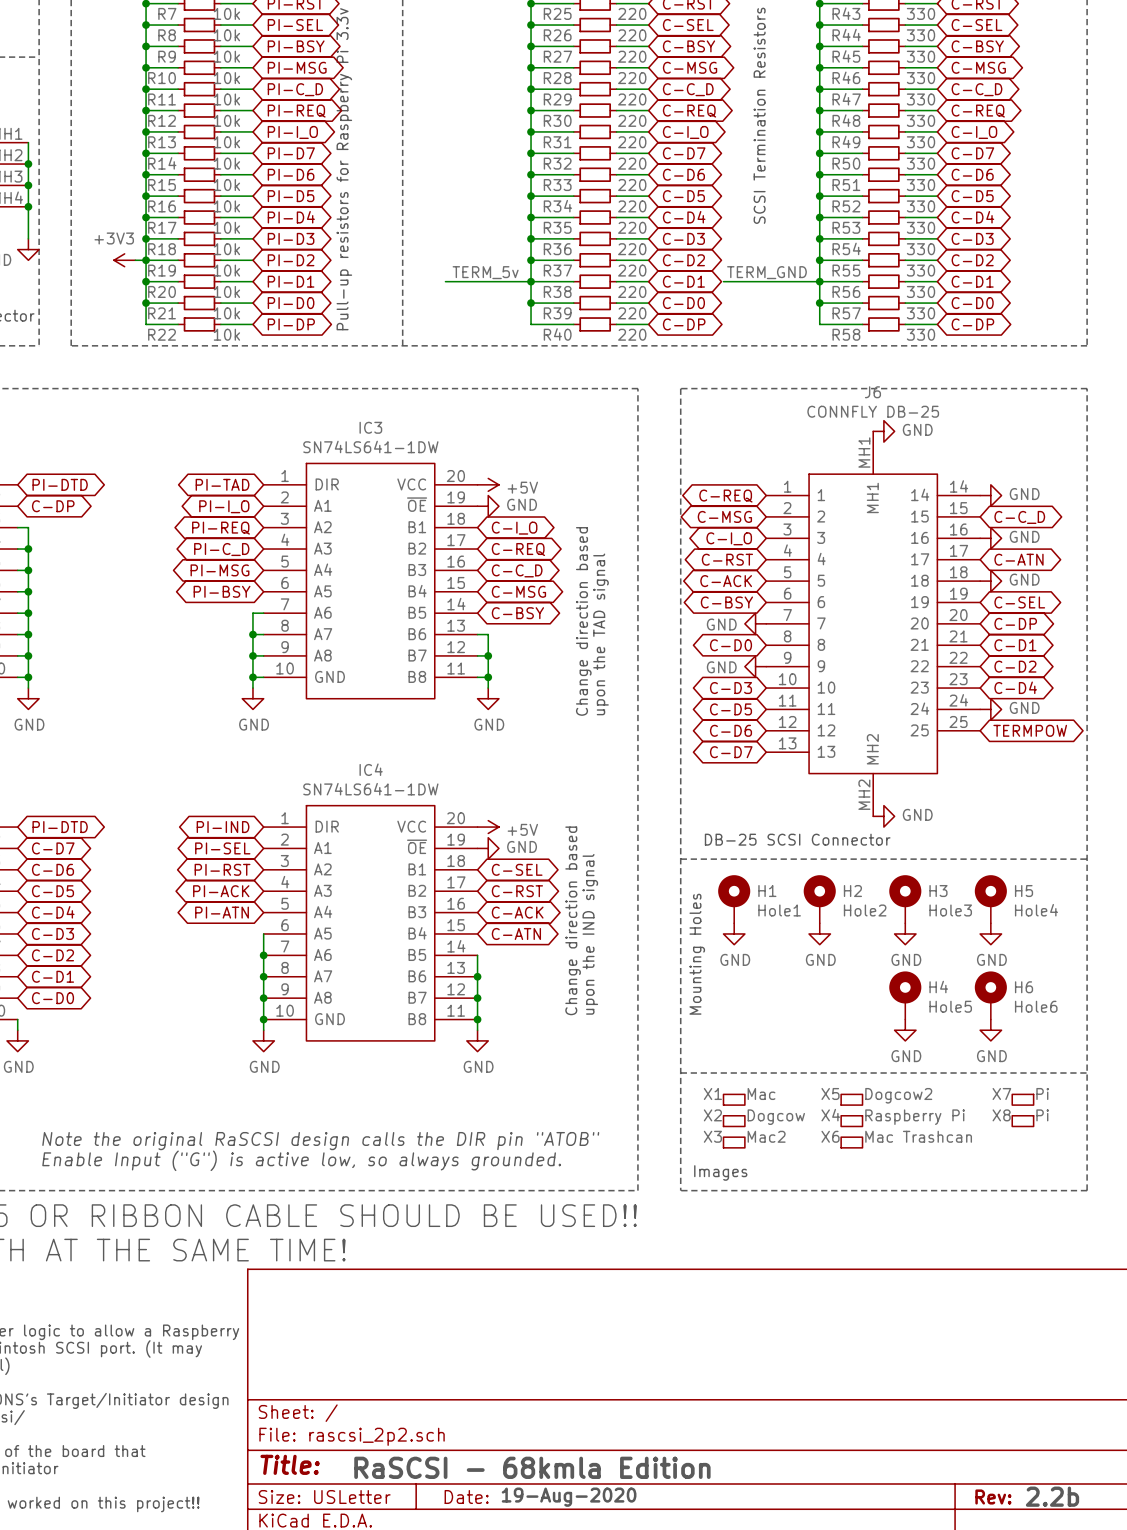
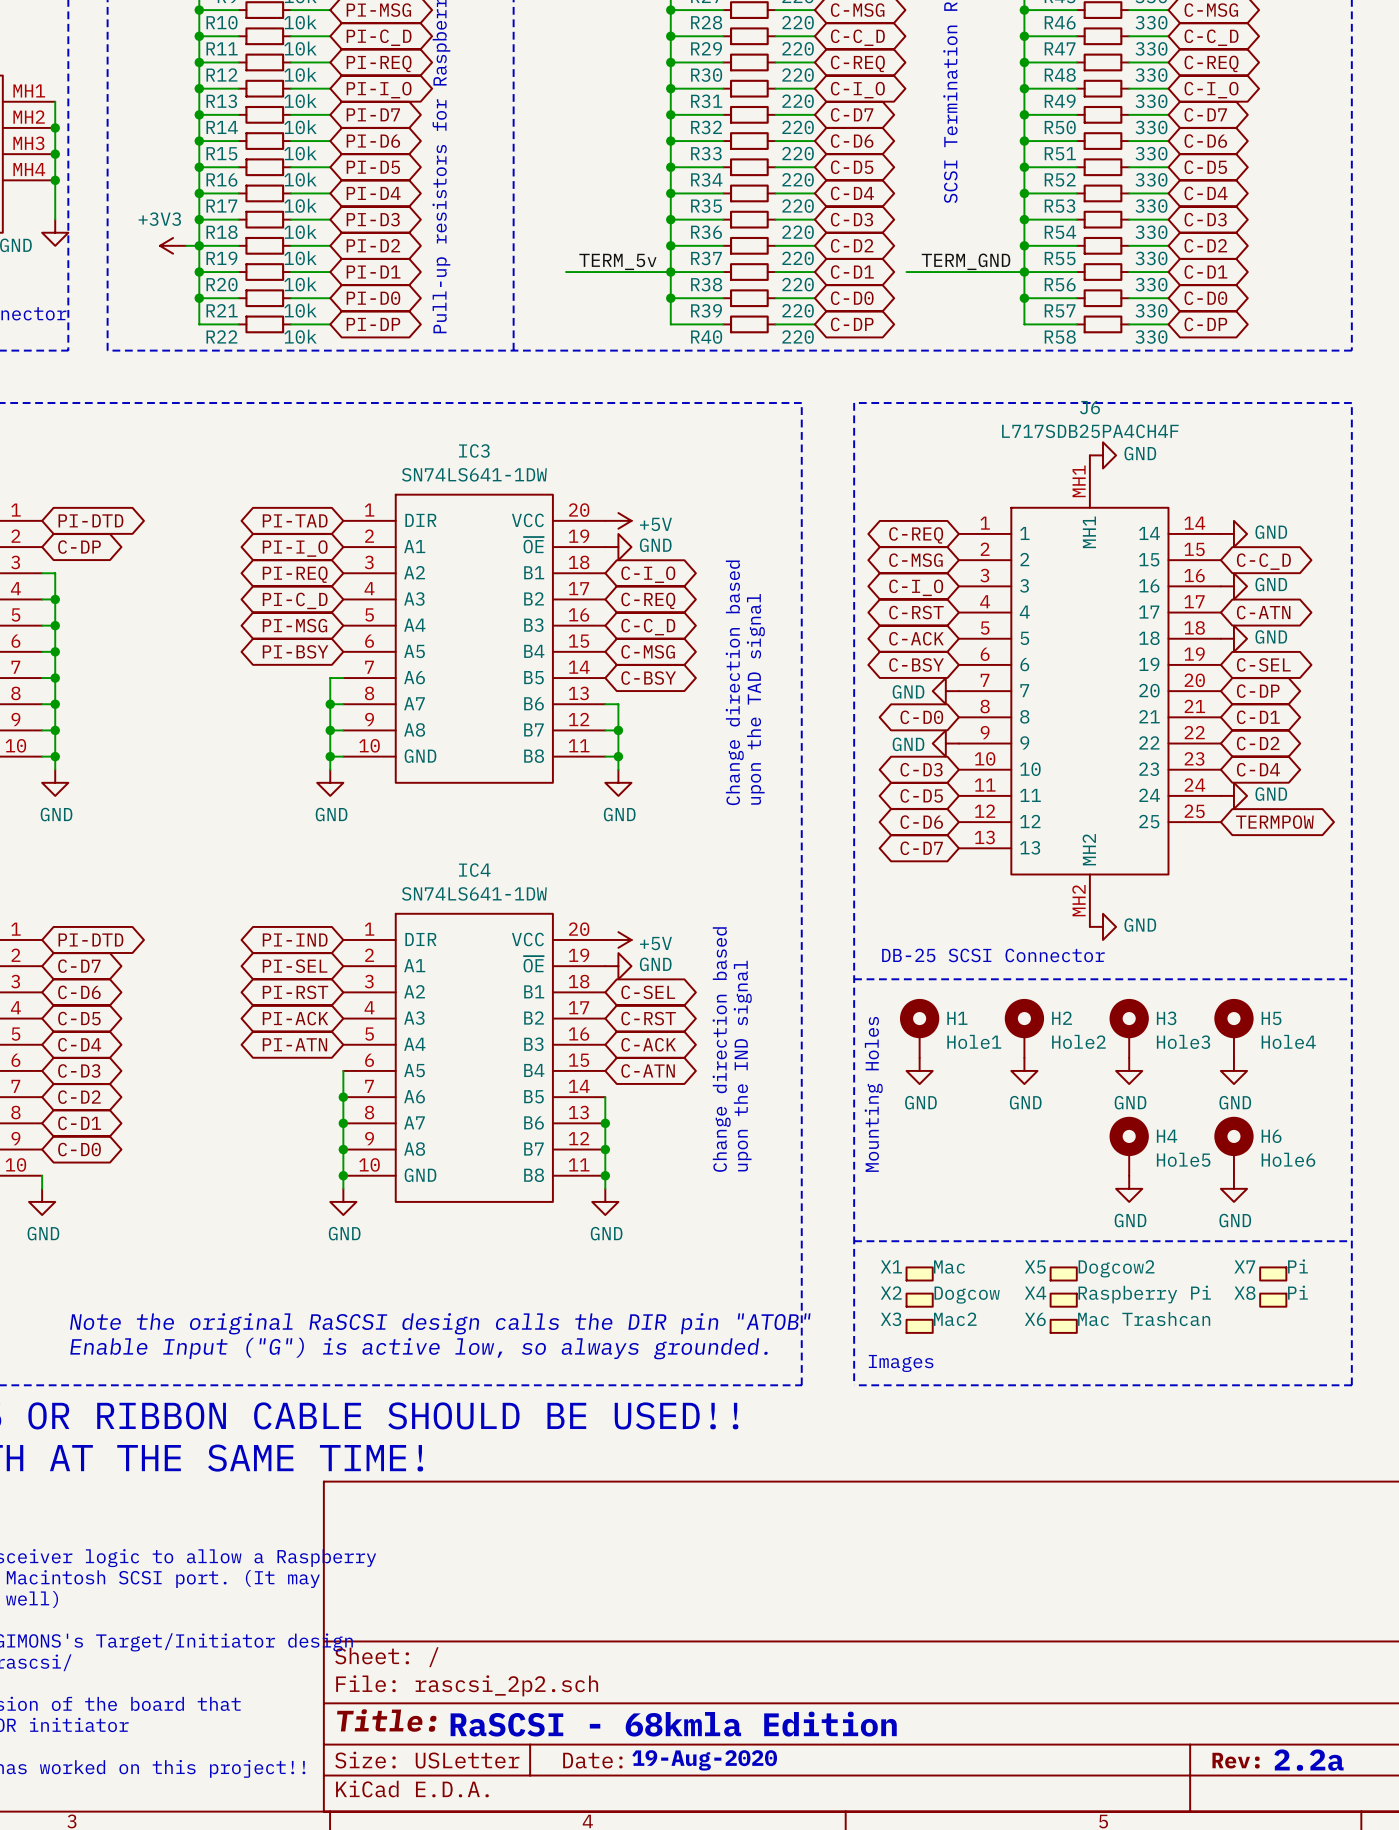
J6 value: CONNFLY DB-25 (873, 411) -> L717SDB25PA4CH4F (1090, 431)
text: 2.2b (1052, 1496) -> 2.2a (1308, 1760)

